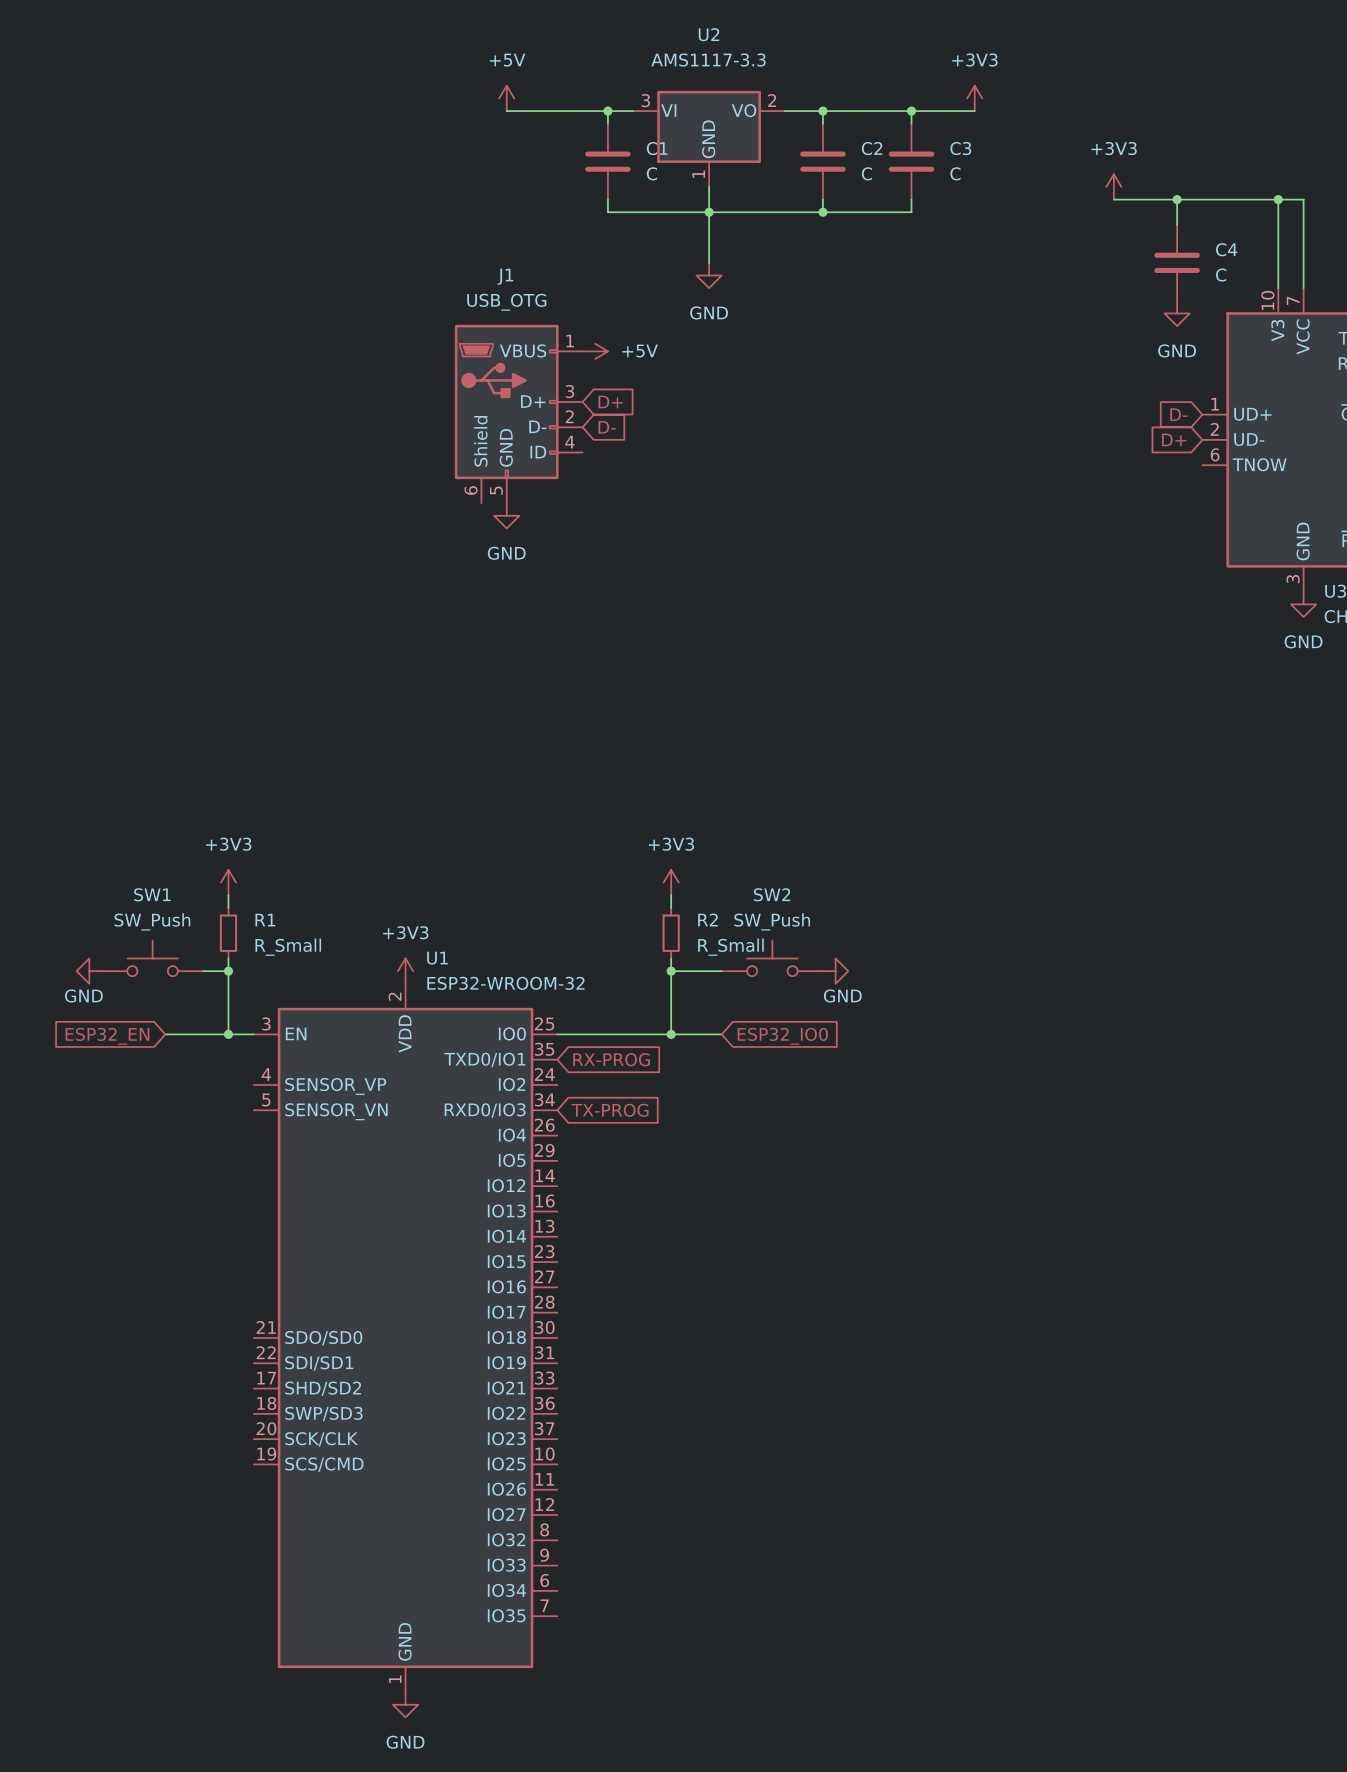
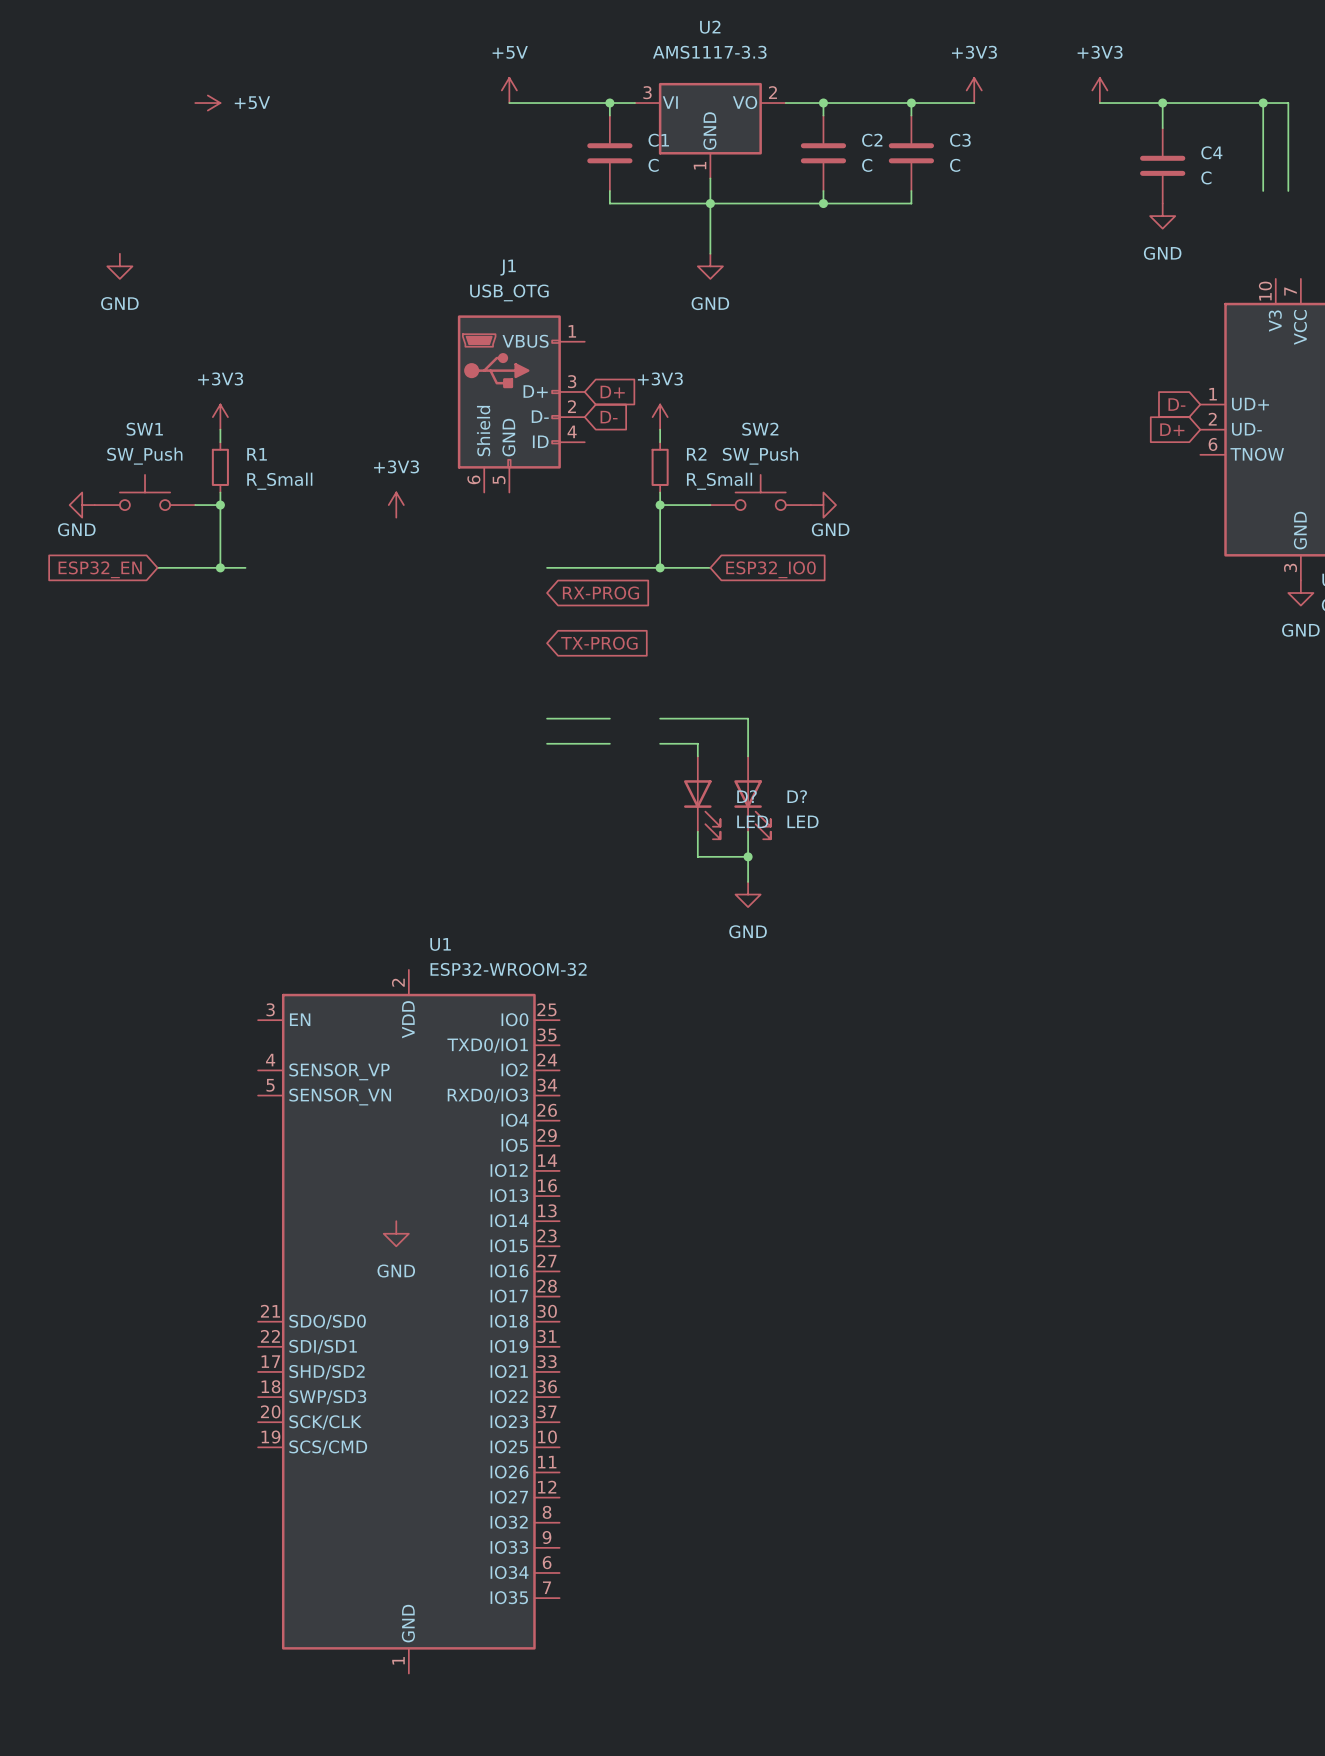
power symbol: none -> +5V (207, 103)
junction: none -> (1162, 103)
junction: none -> (1263, 103)
power symbol position: +3V3 (1113, 186) -> +3V3 (1099, 90)
wire: (1113, 199) (1303, 199) (1303, 288) -> (1099, 103) (1288, 103) (1288, 190)
wire: (1177, 199) (1177, 224) -> (1162, 103) (1162, 128)
junction: (1177, 199) -> none
wire: (1278, 199) (1278, 288) -> (1263, 103) (1263, 190)
junction: (1278, 199) -> none
C4 position: (1177, 262) -> (1162, 165)
power symbol: none -> GND (119, 266)
power symbol position: GND (1177, 313) -> GND (1162, 216)
power symbol: +5V (595, 351) -> none
power symbol: none -> +3V3 (220, 417)
power symbol: none -> +3V3 (660, 417)
wire: none -> (220, 429) (220, 442)
wire: none -> (660, 429) (660, 442)
wire: none -> (220, 492) (220, 567)
wire: none -> (660, 492) (660, 567)
power symbol: none -> GND (82, 505)
wire: none -> (195, 505) (220, 505)
junction: none -> (220, 505)
power symbol: none -> +3V3 (396, 505)
power symbol: GND (506, 515) -> none
wire: none -> (660, 505) (710, 505)
junction: none -> (660, 505)
power symbol: none -> GND (823, 505)
wire: none -> (157, 567) (245, 567)
junction: none -> (220, 567)
wire: none -> (547, 567) (710, 567)
junction: none -> (660, 567)
global label: none -> ESP32_EN (100, 569)
global label: none -> ESP32_IO0 (770, 569)
global label: none -> RX-PROG (600, 593)
global label: none -> TX-PROG (599, 643)
wire: none -> (547, 718) (609, 718)
wire: none -> (660, 718) (748, 718) (748, 756)
wire: none -> (547, 743) (609, 743)
wire: none -> (660, 743) (697, 743) (697, 756)
D?: none -> LED (702, 797)
D?: none -> LED (752, 797)
wire: none -> (697, 831) (697, 856) (748, 856)
wire: none -> (748, 831) (748, 881)
junction: none -> (748, 856)
power symbol: +3V3 (228, 882) -> none
power symbol: +3V3 (671, 882) -> none
wire: (228, 895) (228, 907) -> none
wire: (671, 895) (671, 907) -> none
R1 position: (228, 933) -> (220, 467)
R2 position: (671, 933) -> (660, 467)
SW1 position: (152, 958) -> (145, 492)
wire: (228, 958) (228, 1034) -> none
wire: (671, 958) (671, 1034) -> none
SW2 position: (772, 958) -> (760, 492)
power symbol: GND (89, 971) -> none
wire: (203, 971) (228, 971) -> none
junction: (228, 971) -> none
power symbol: +3V3 (405, 971) -> none
wire: (671, 971) (721, 971) -> none
junction: (671, 971) -> none
power symbol rotation: 0° (835, 971) -> 90° clockwise (748, 894)
power symbol position: GND (835, 971) -> GND (748, 894)
wire: (165, 1034) (253, 1034) -> none
junction: (228, 1034) -> none
wire: (557, 1034) (721, 1034) -> none
junction: (671, 1034) -> none
global label: ESP32_EN (107, 1036) -> none
global label: ESP32_IO0 (782, 1036) -> none
global label: RX-PROG (611, 1059) -> none
global label: TX-PROG (610, 1110) -> none
power symbol: none -> GND (396, 1233)
power symbol: GND (405, 1704) -> none

